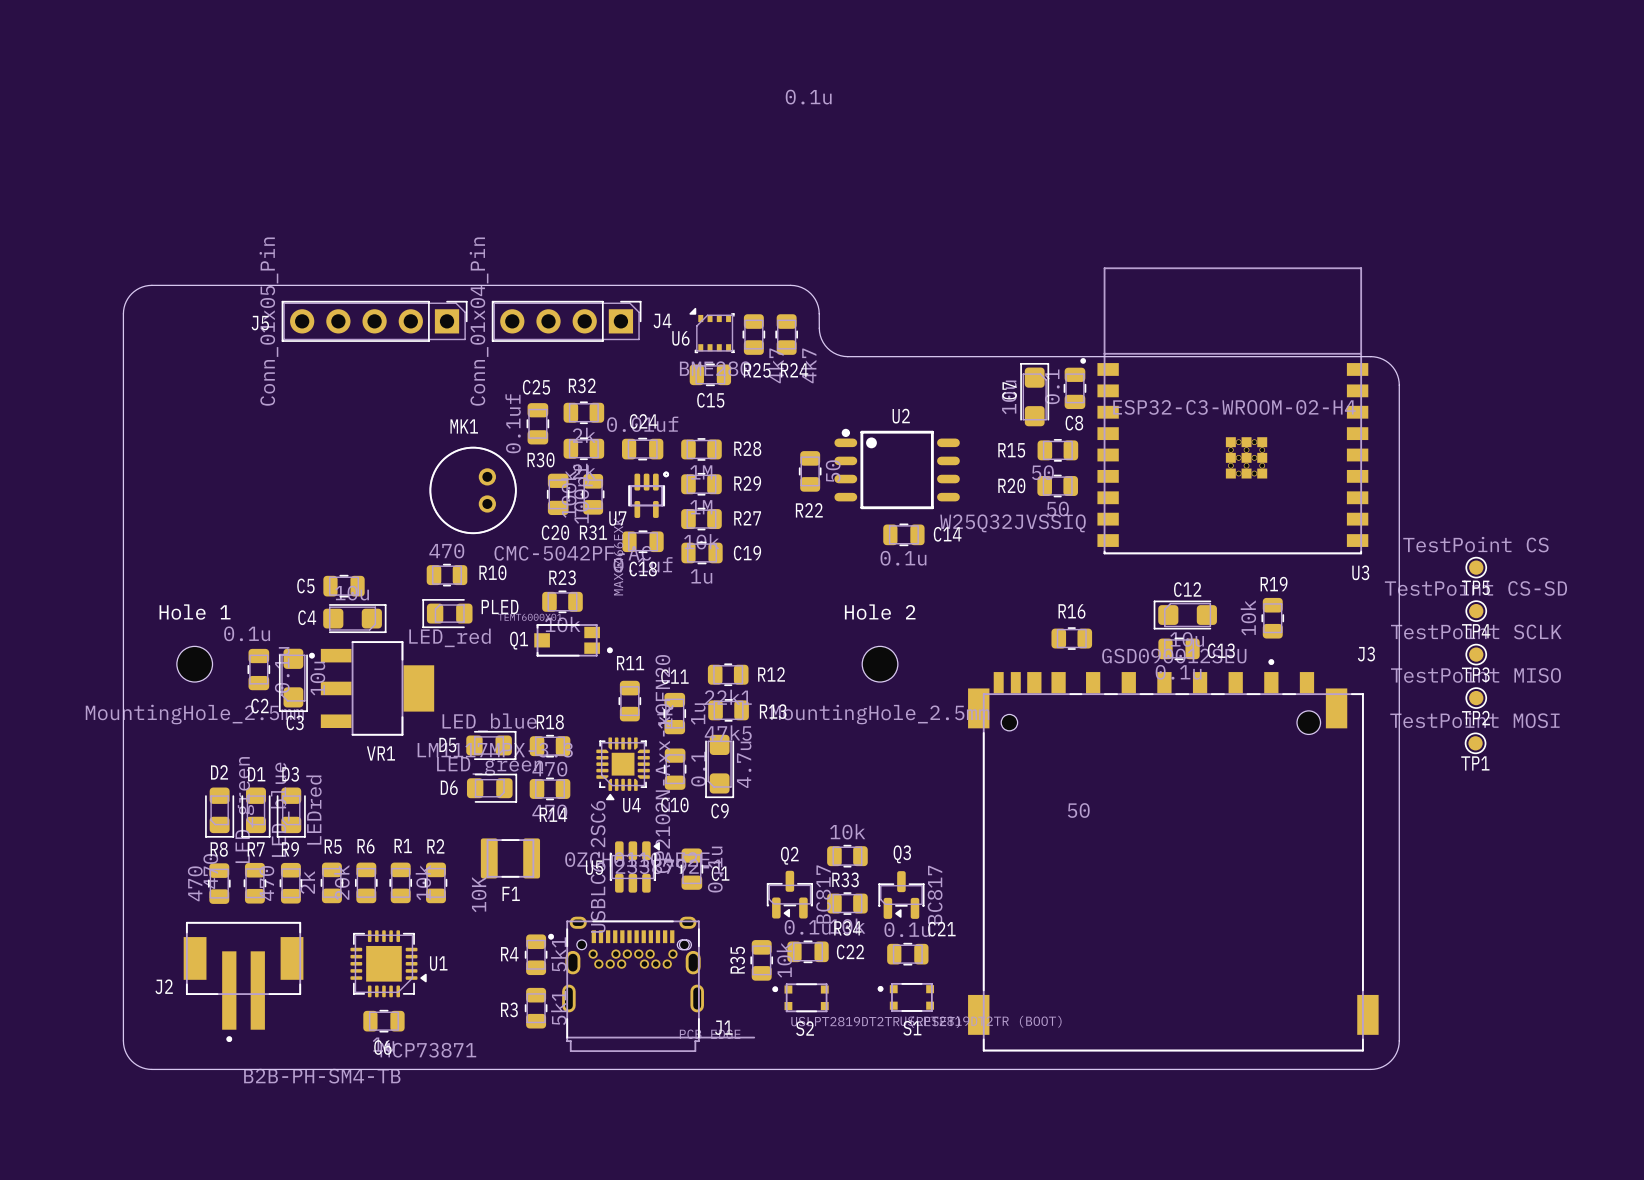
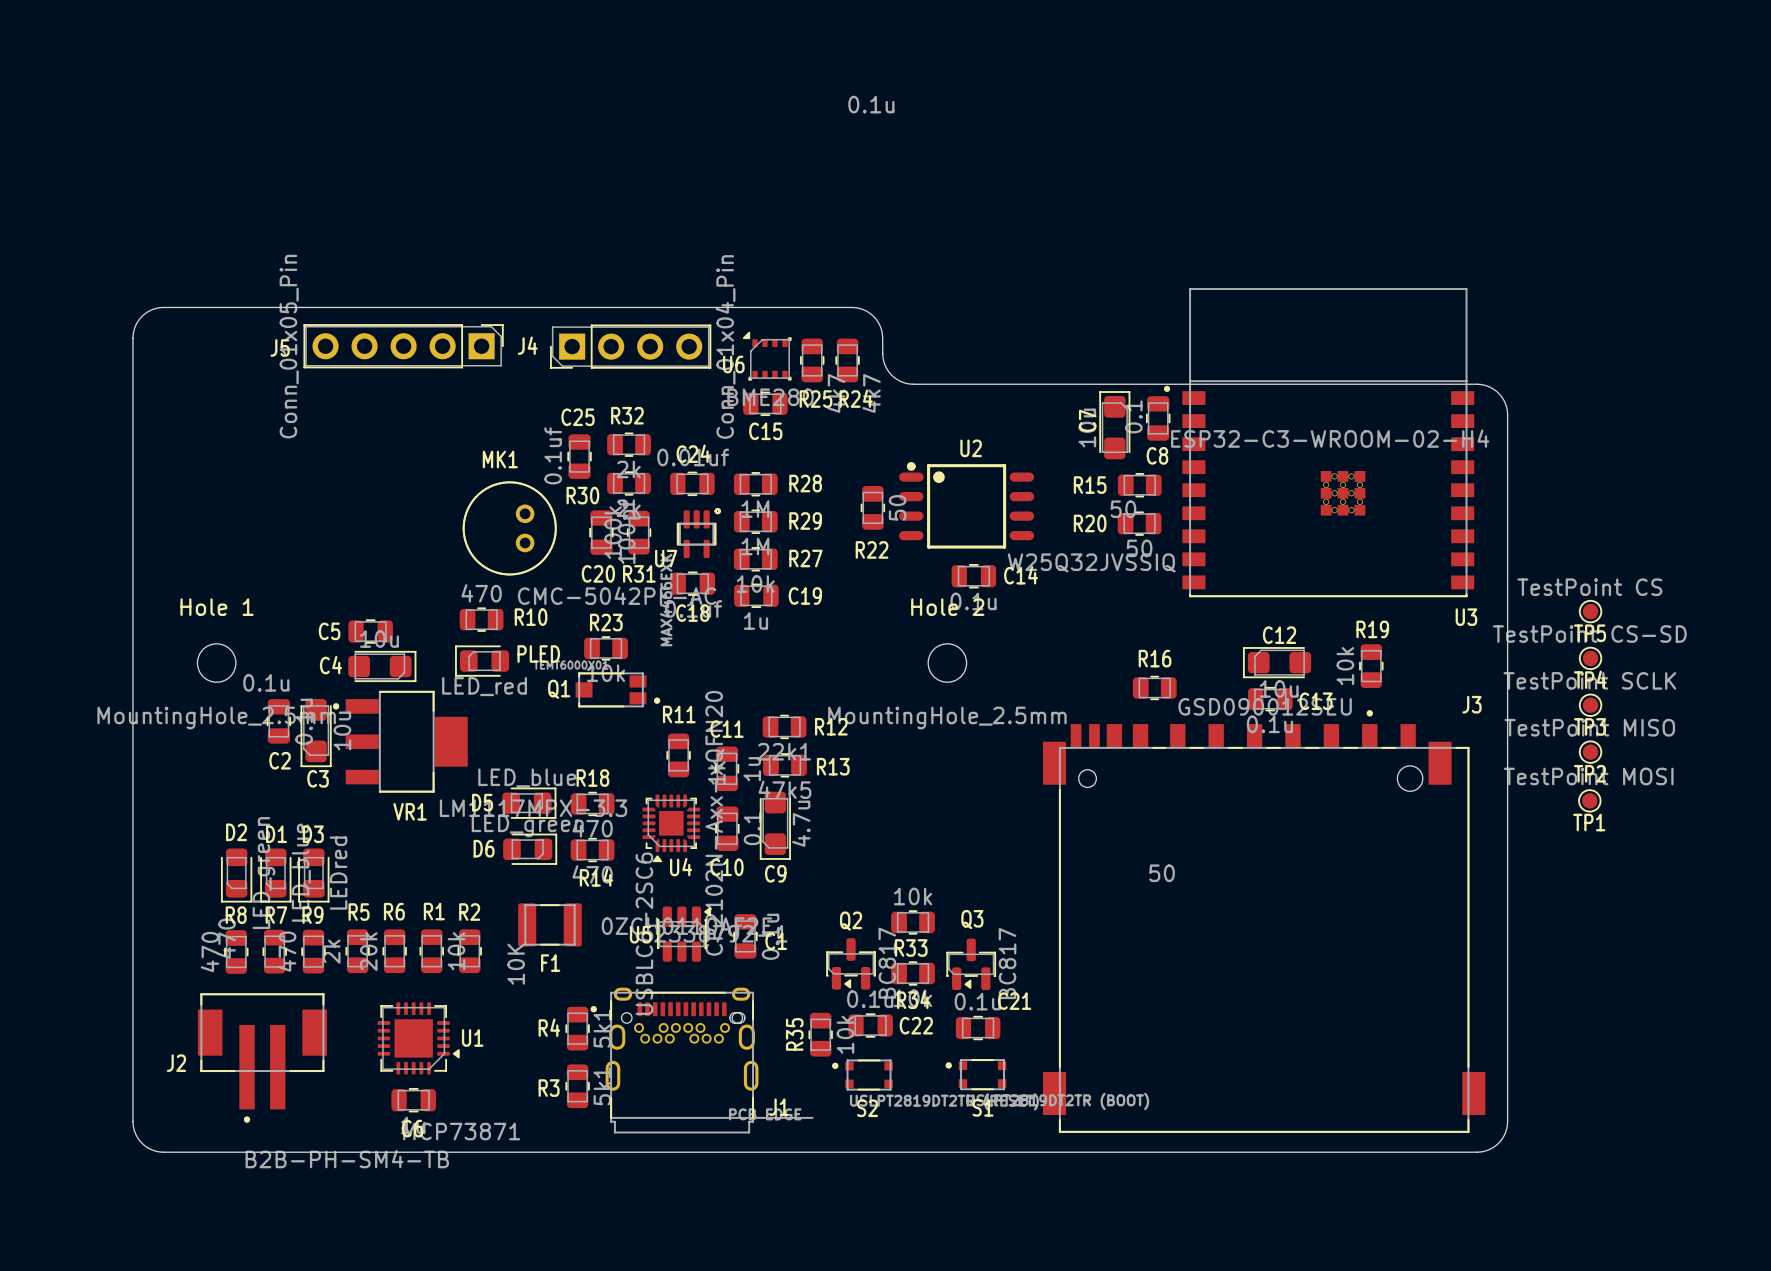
J4 rotation: 0° (566, 321) -> 180° (630, 346)
Hole 1 position: (194, 664) -> (216, 663)
Hole 2 position: (880, 664) -> (947, 663)

